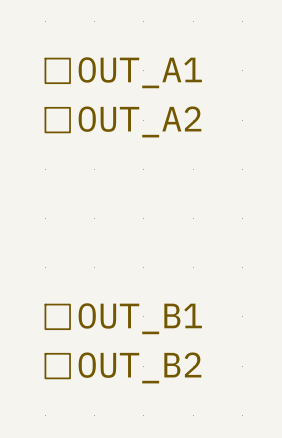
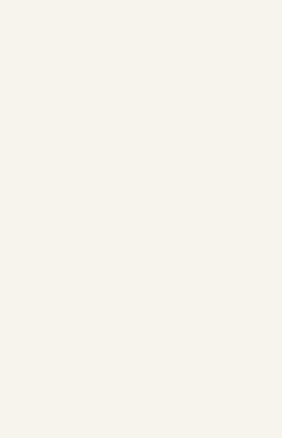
hierarchical label: OUT_A1 (140, 72) -> none
hierarchical label: OUT_A2 (139, 121) -> none
hierarchical label: OUT_B1 (140, 318) -> none
hierarchical label: OUT_B2 (139, 367) -> none

